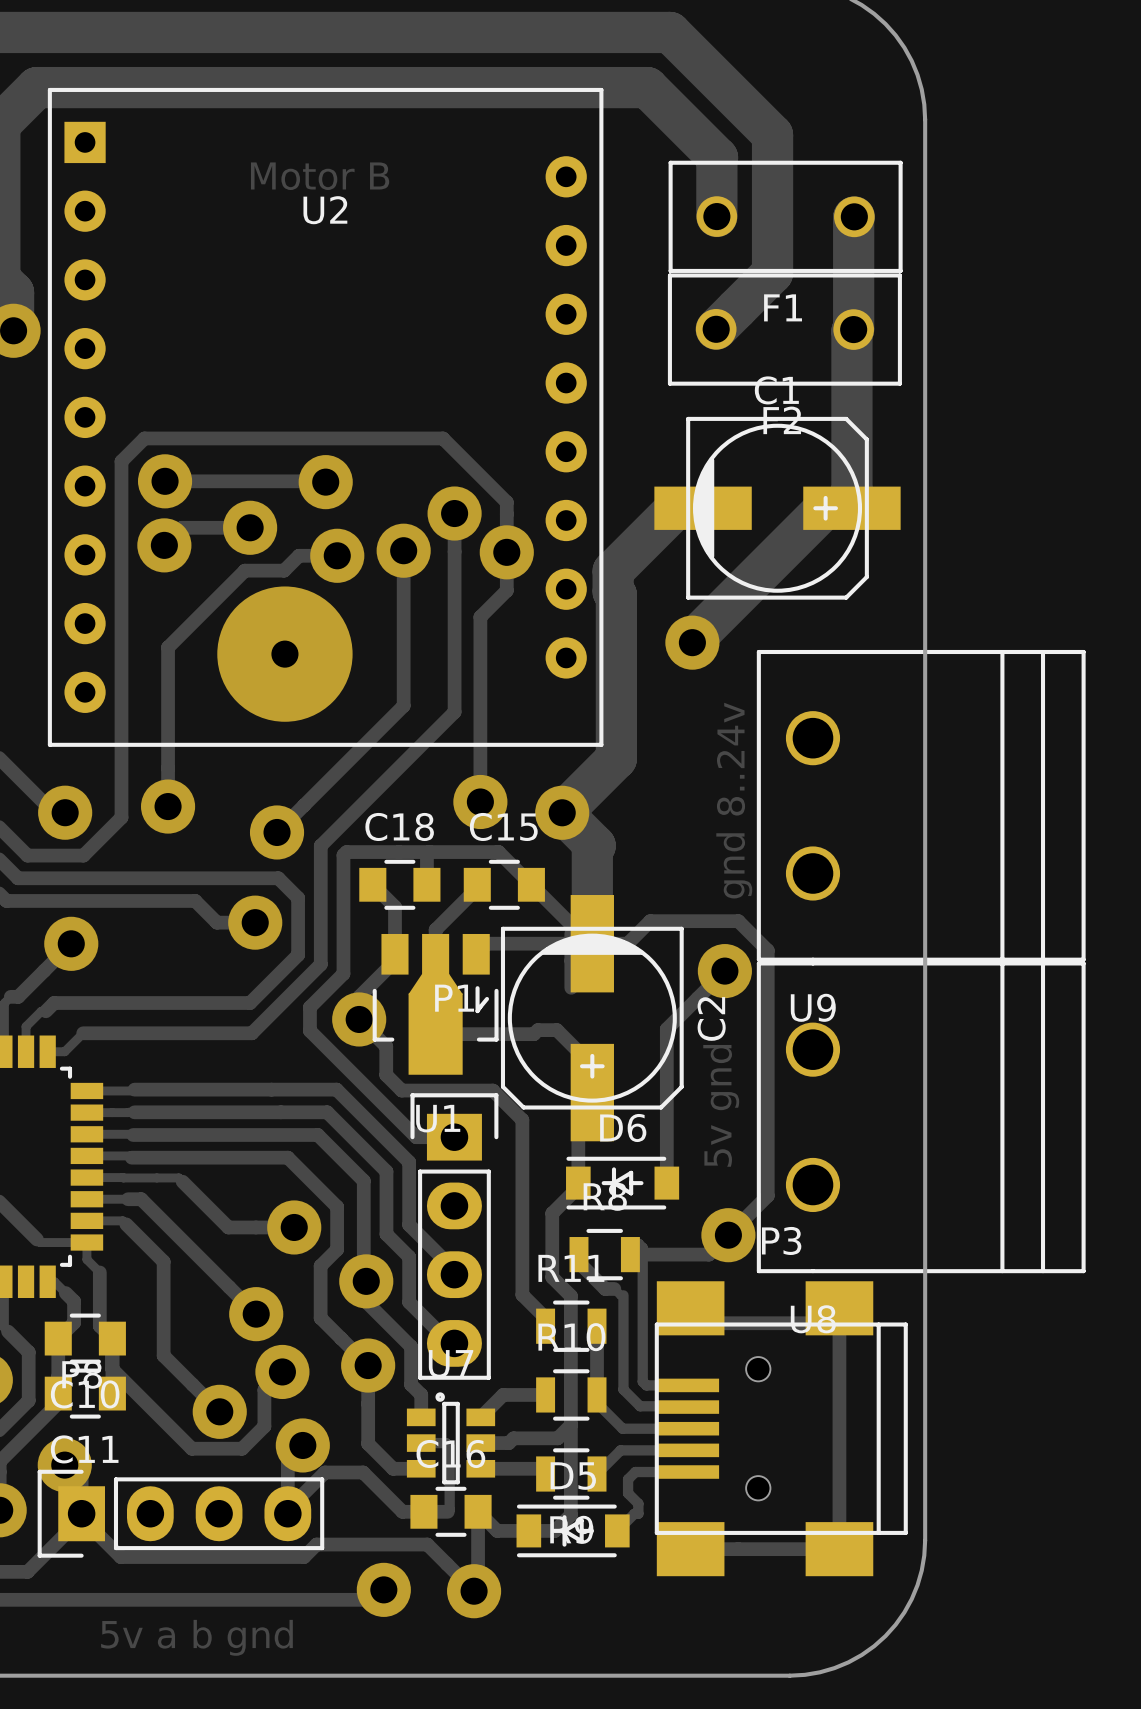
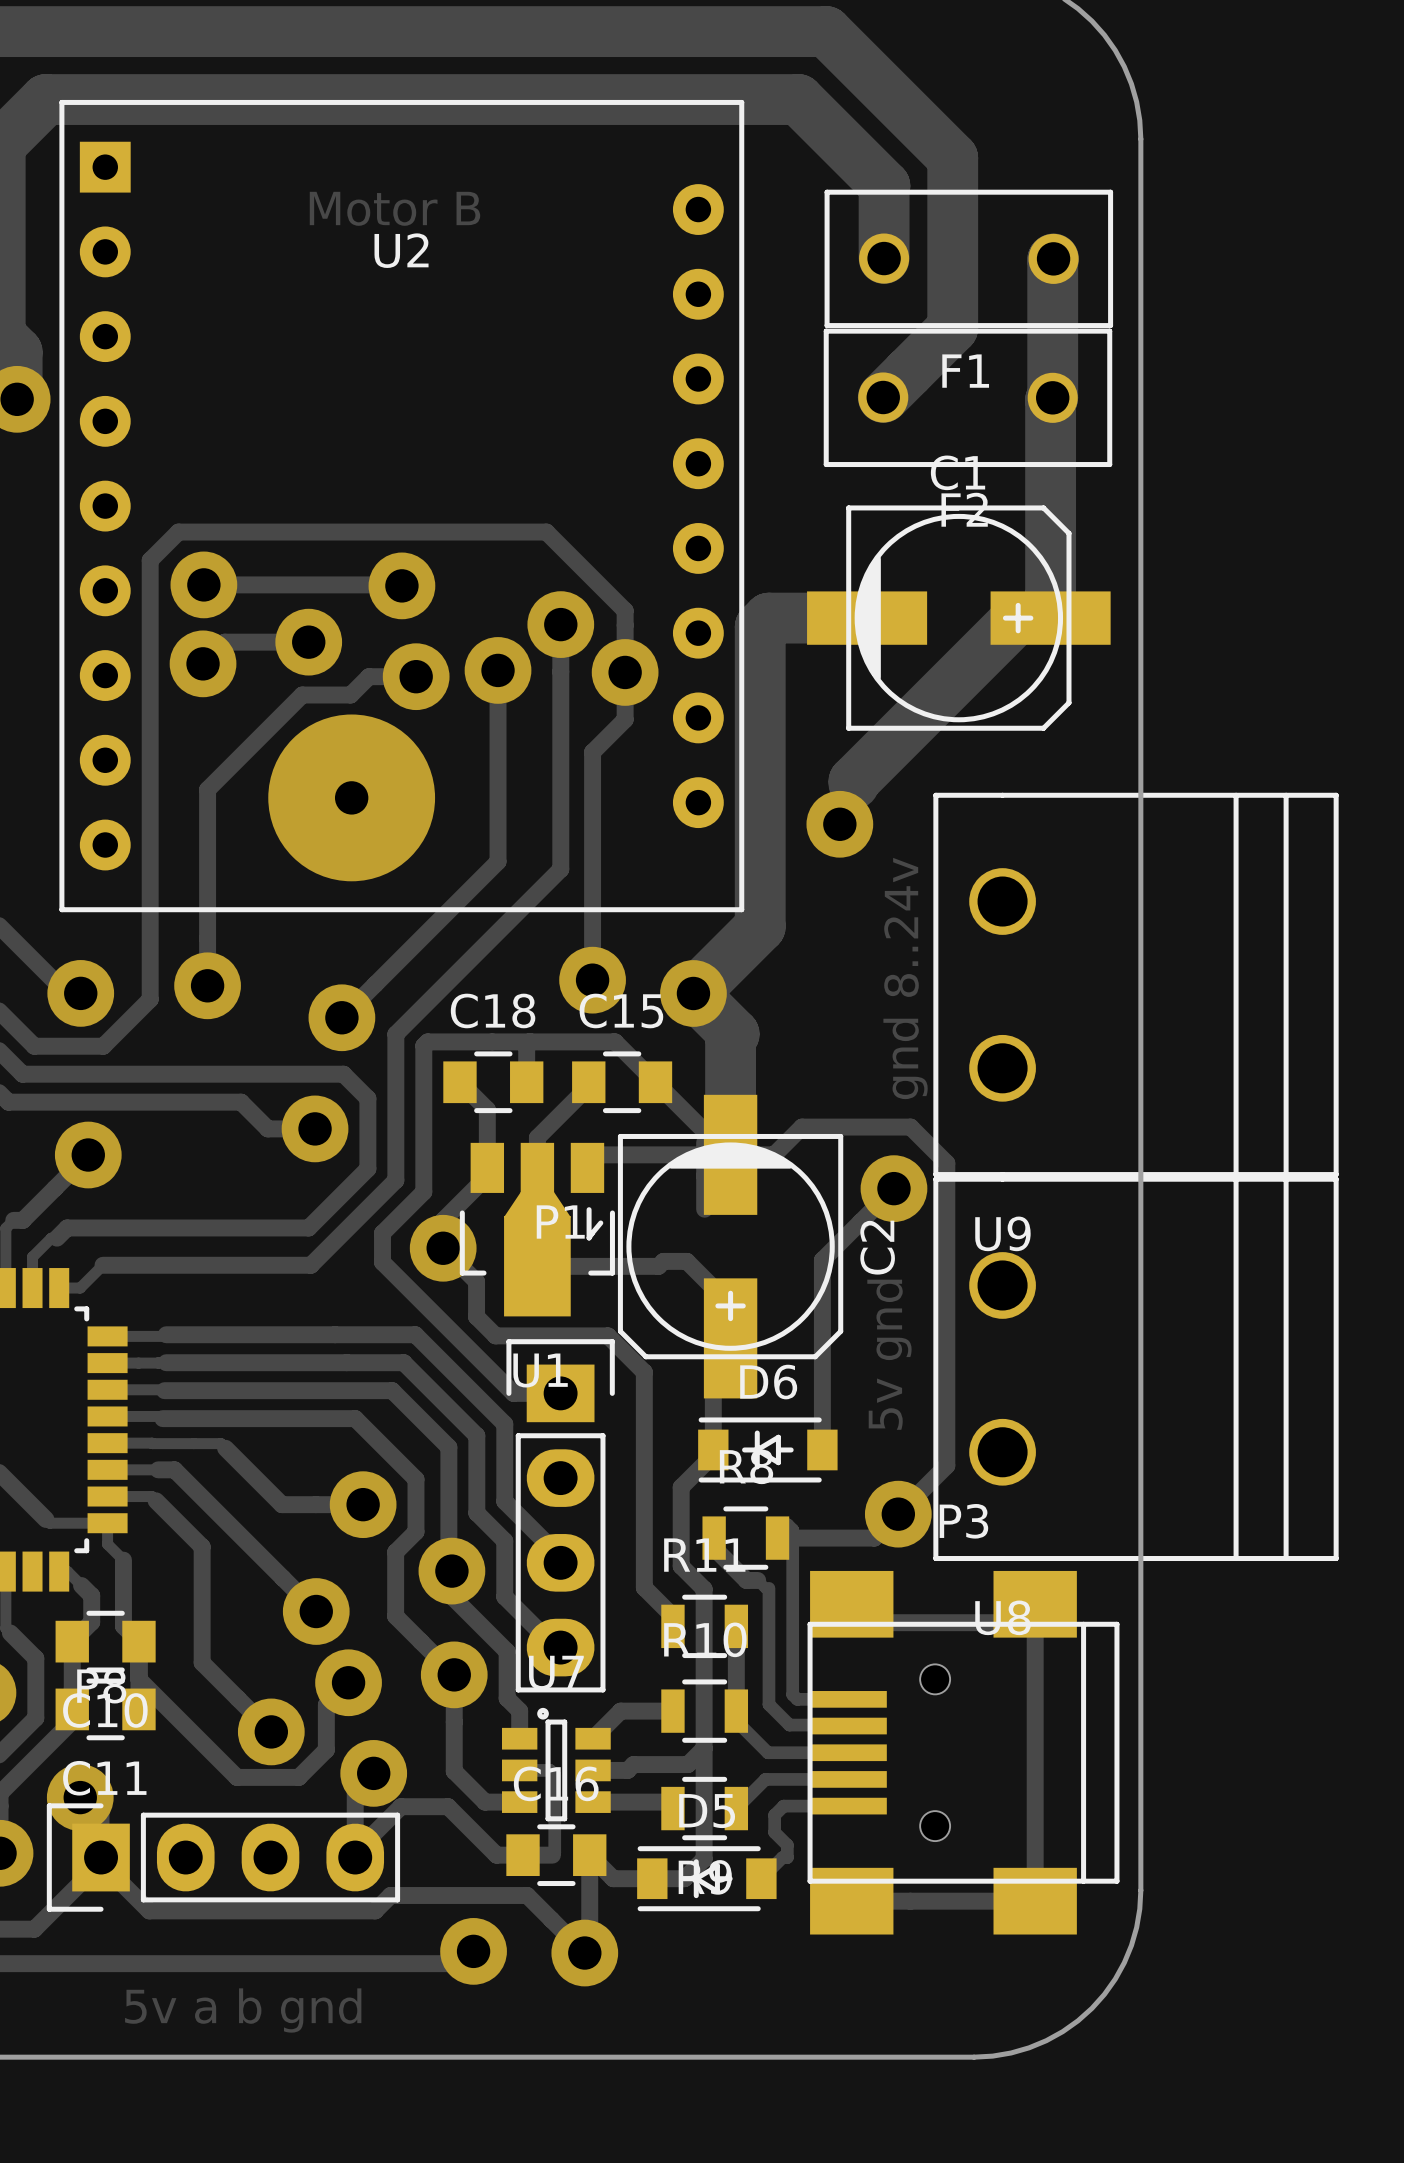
track: (676, 508) (613, 571) (613, 591) (616, 594) -> (833, 618) (768, 618) (760, 626) (760, 724)
via position: (692, 642) -> (839, 824)

